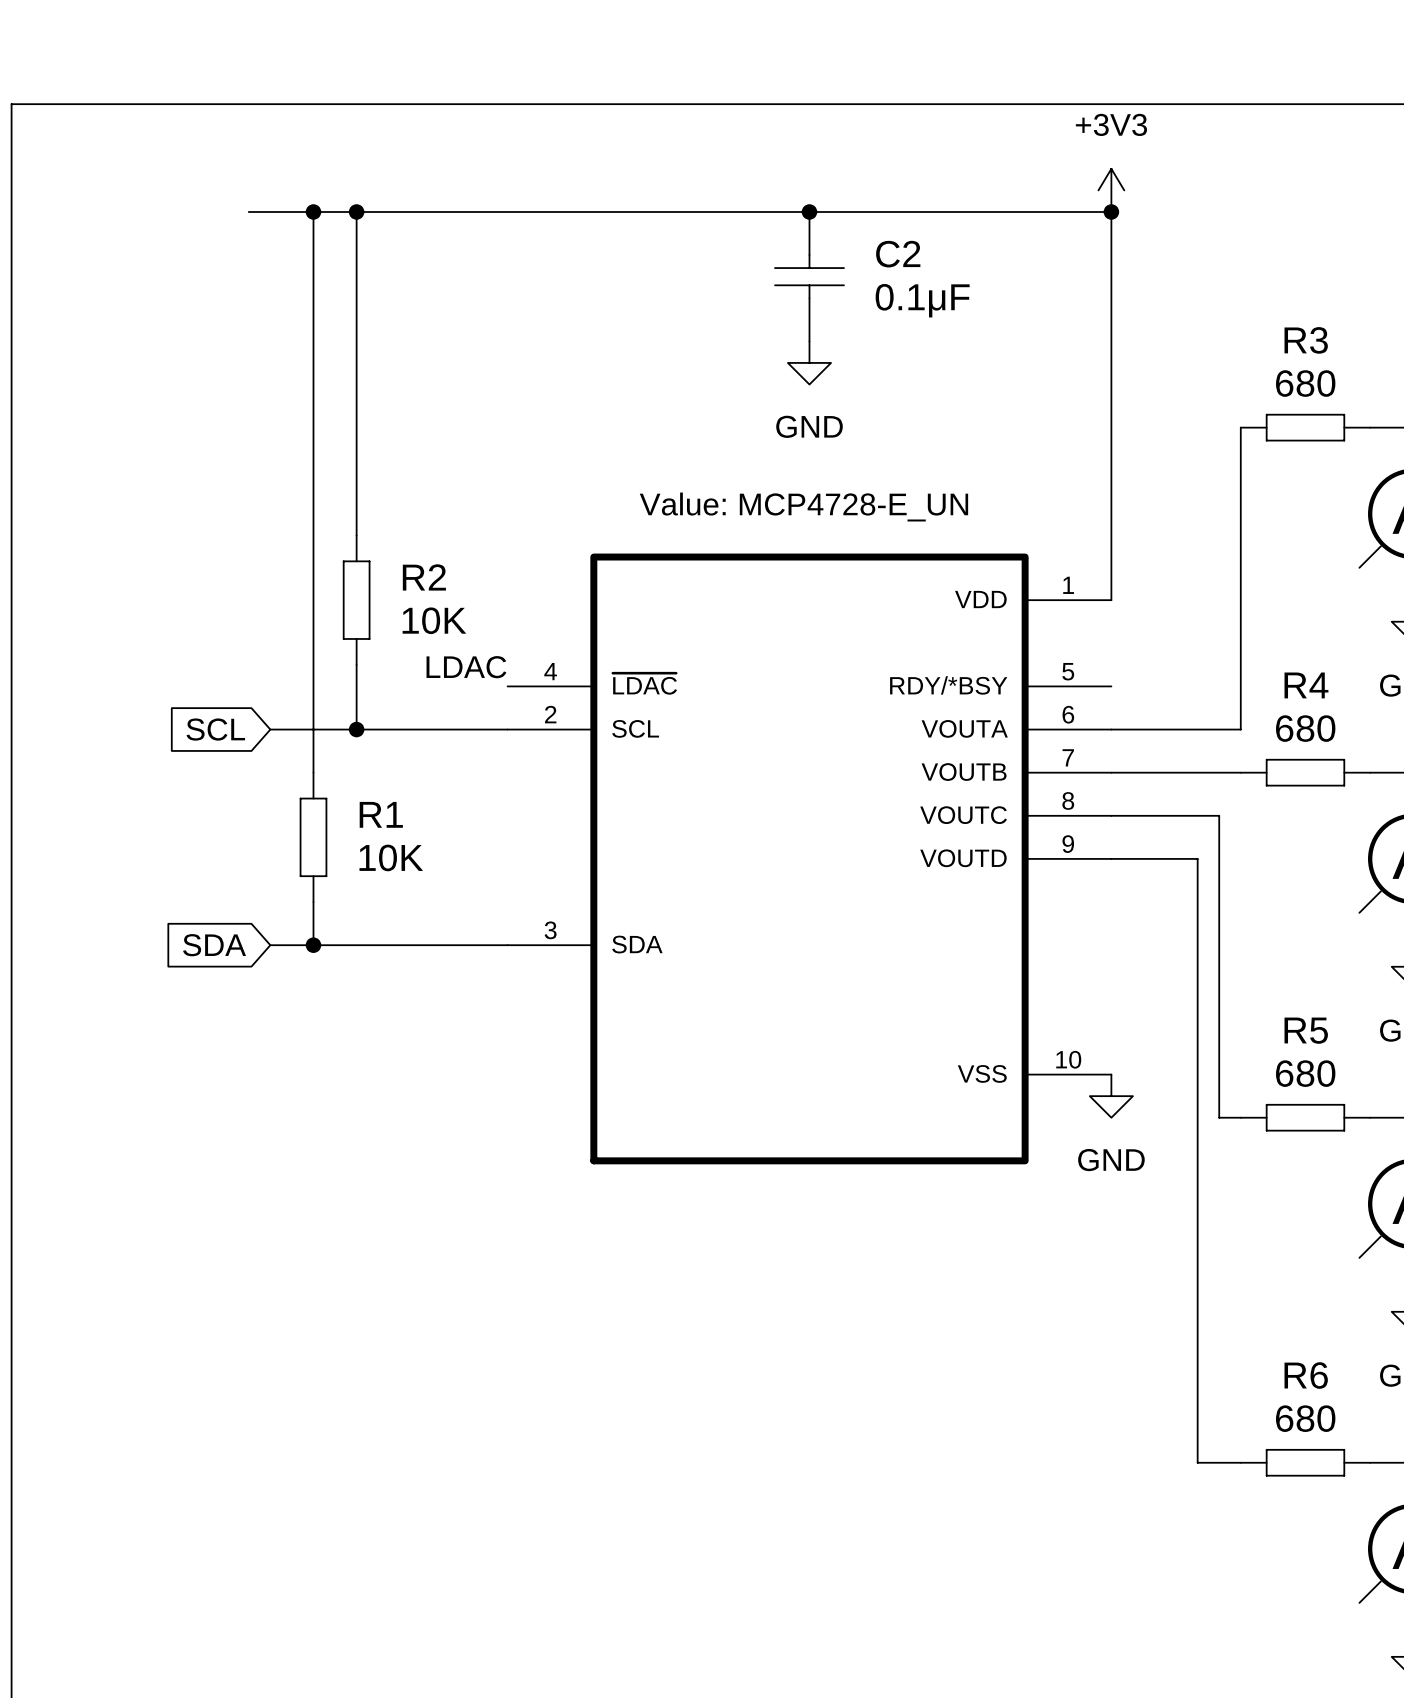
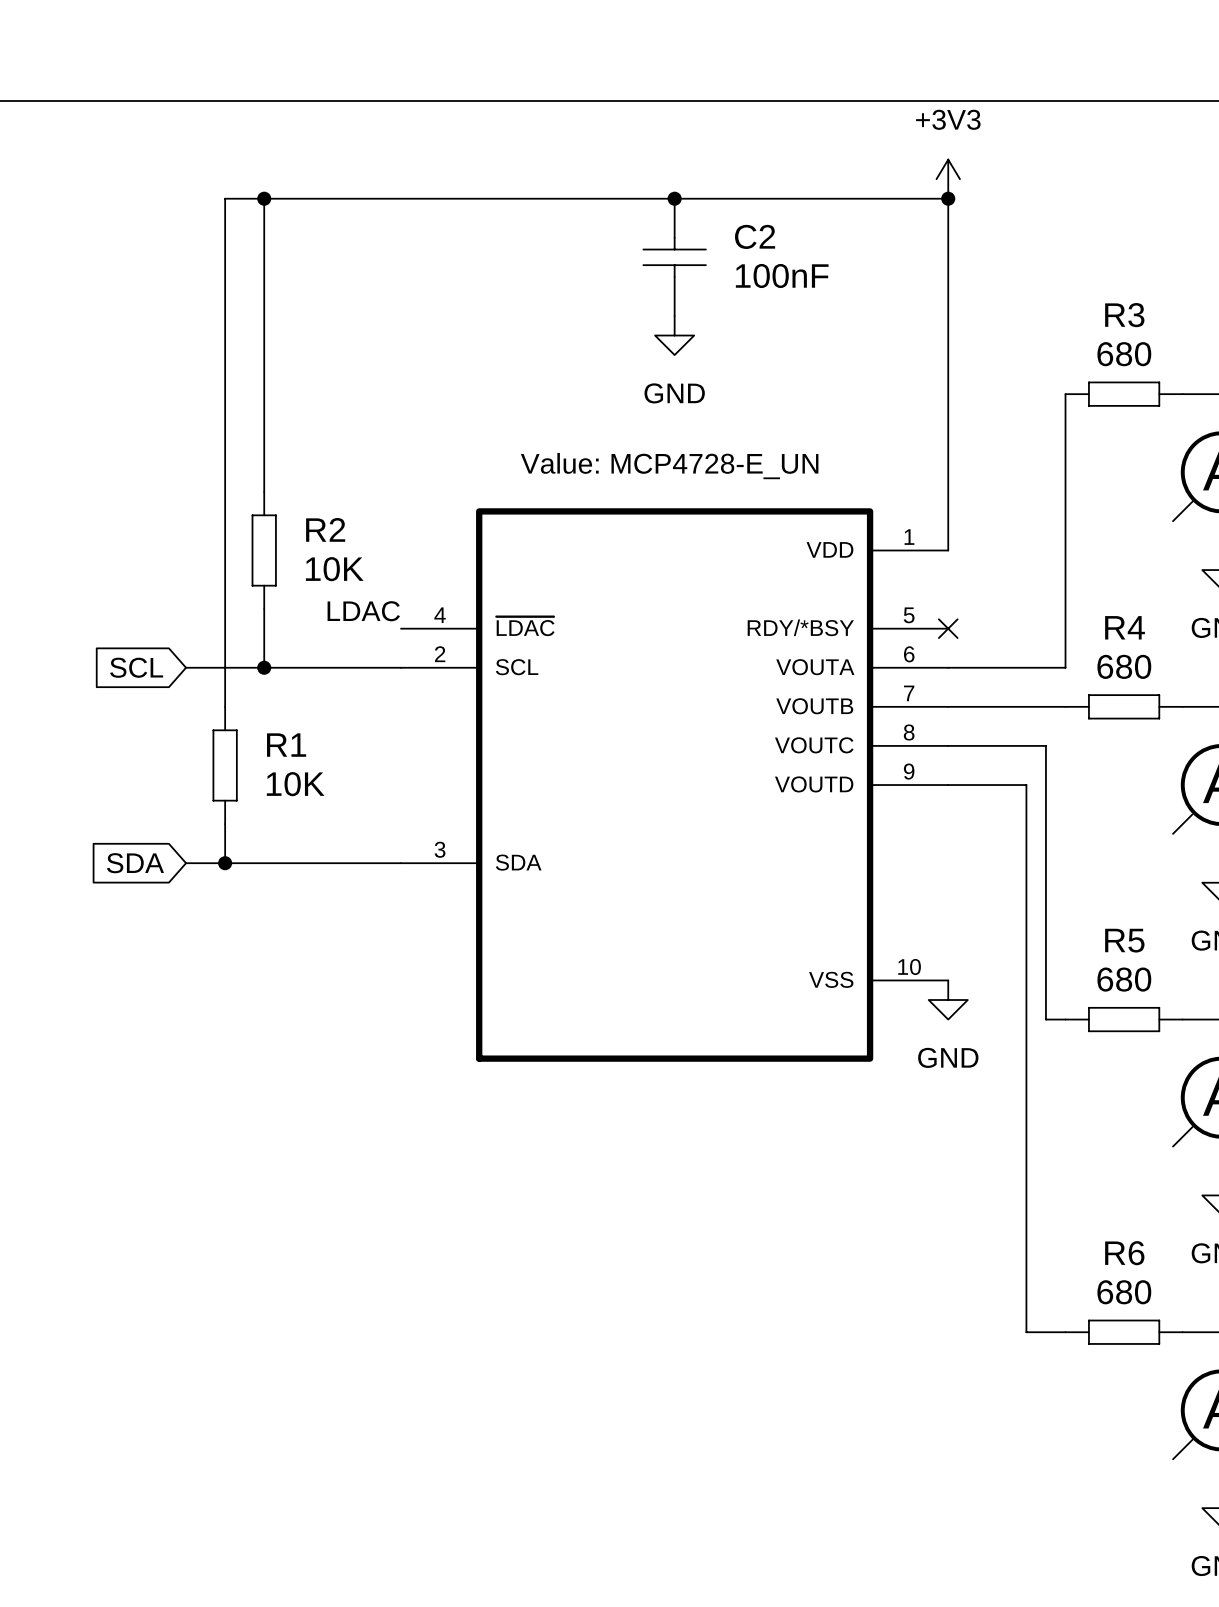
wire: (248, 211) (313, 211) -> none
junction: (313, 211) -> none
C2 value: 0.1μF (922, 300) -> 100nF (782, 276)
no-connect mark: none -> (948, 628)

